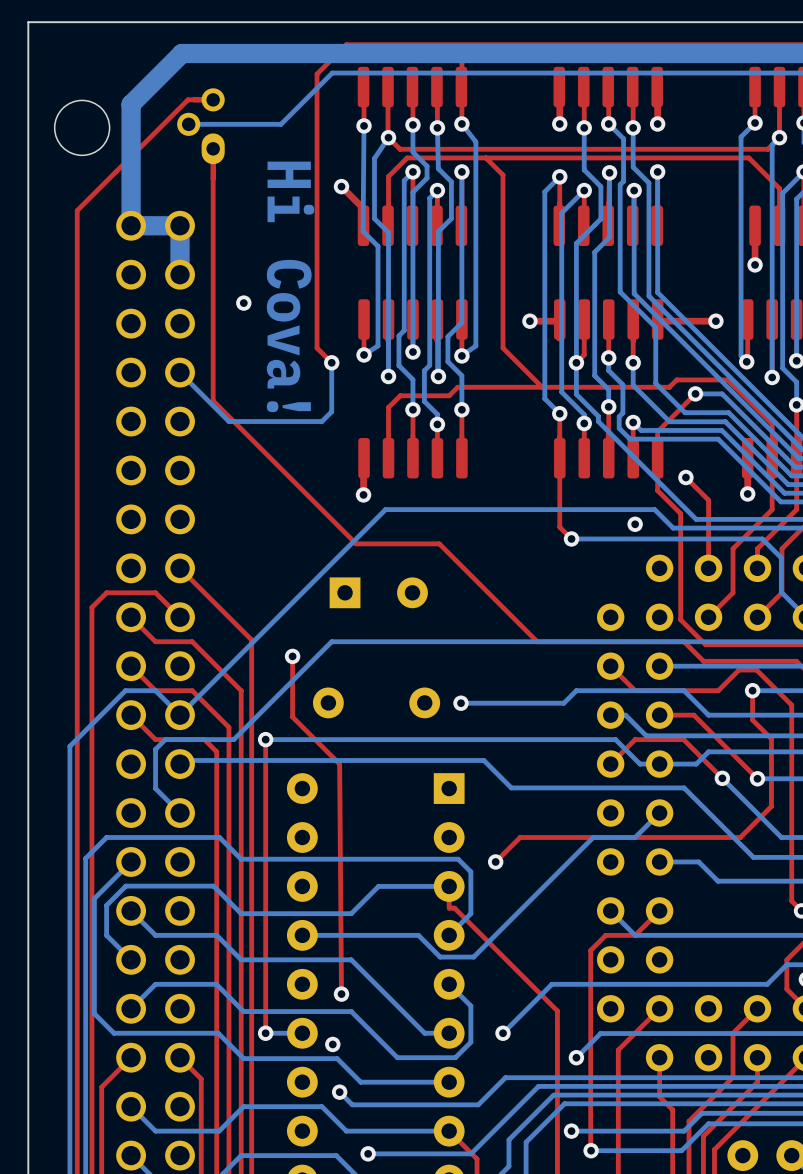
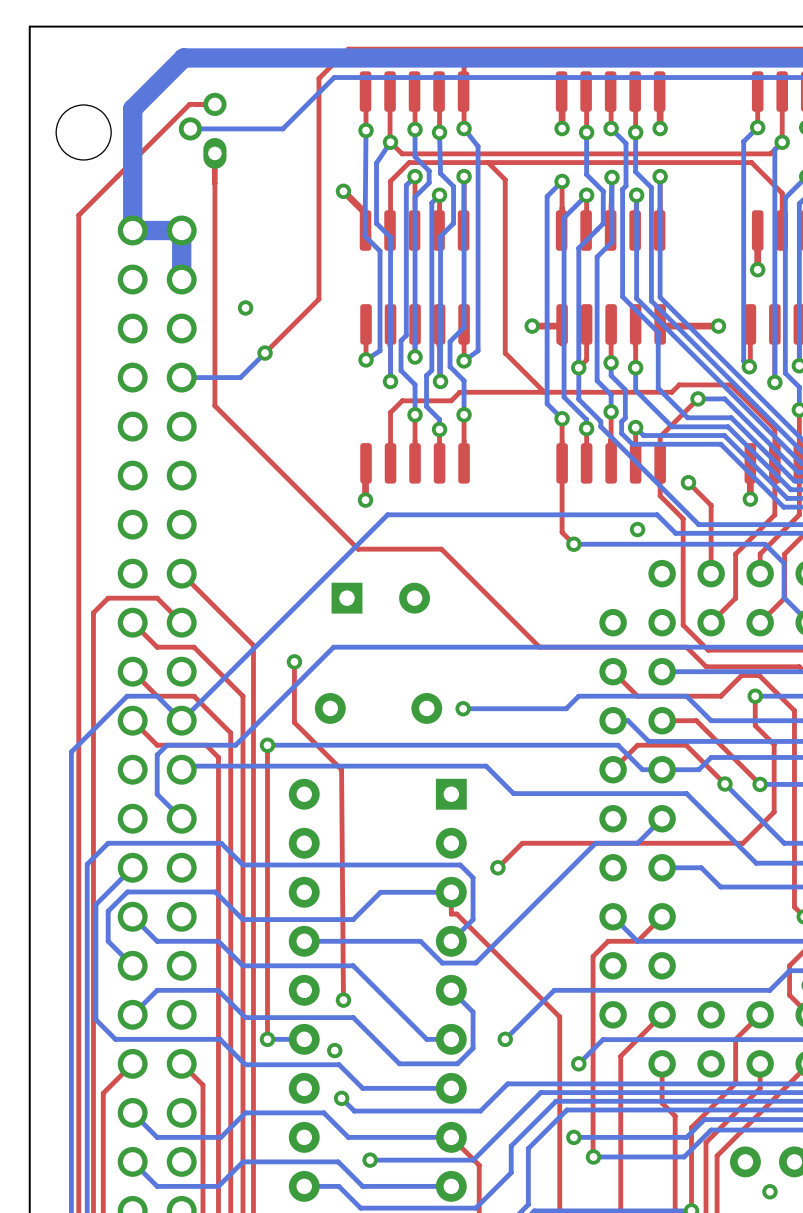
text: Hi Cova! (290, 286) -> none
top track: (317, 294) (317, 348) (331, 362) -> (318, 299) (265, 353)
bottom track: (331, 362) (331, 411) (321, 421) (228, 421) (180, 372) -> (265, 353) (240, 377) (181, 377)
via position: (331, 362) -> (265, 353)

